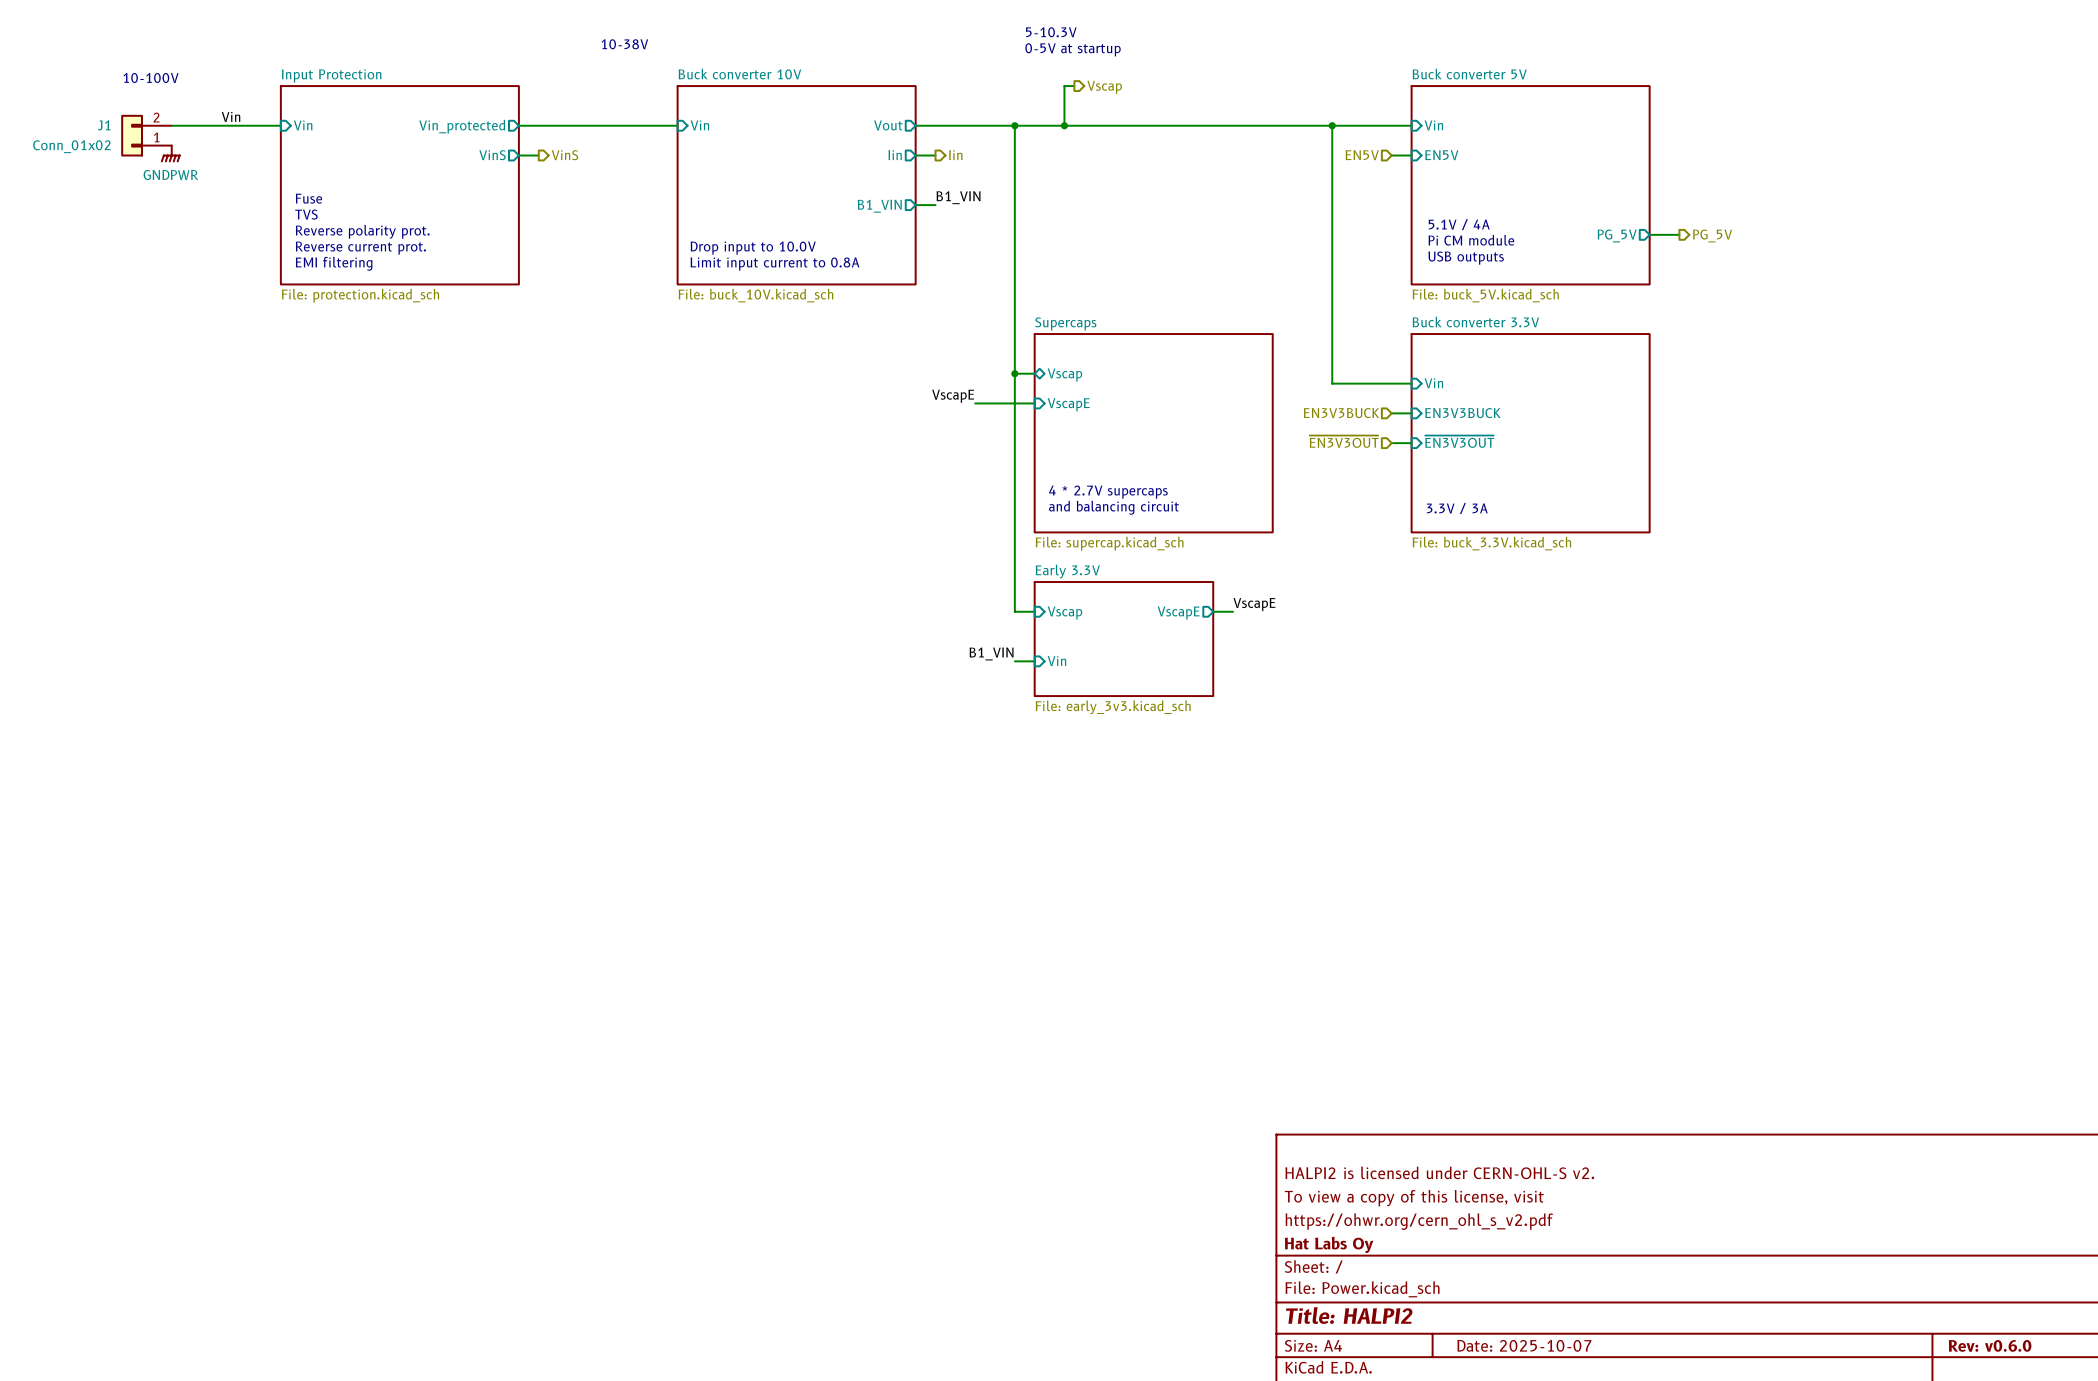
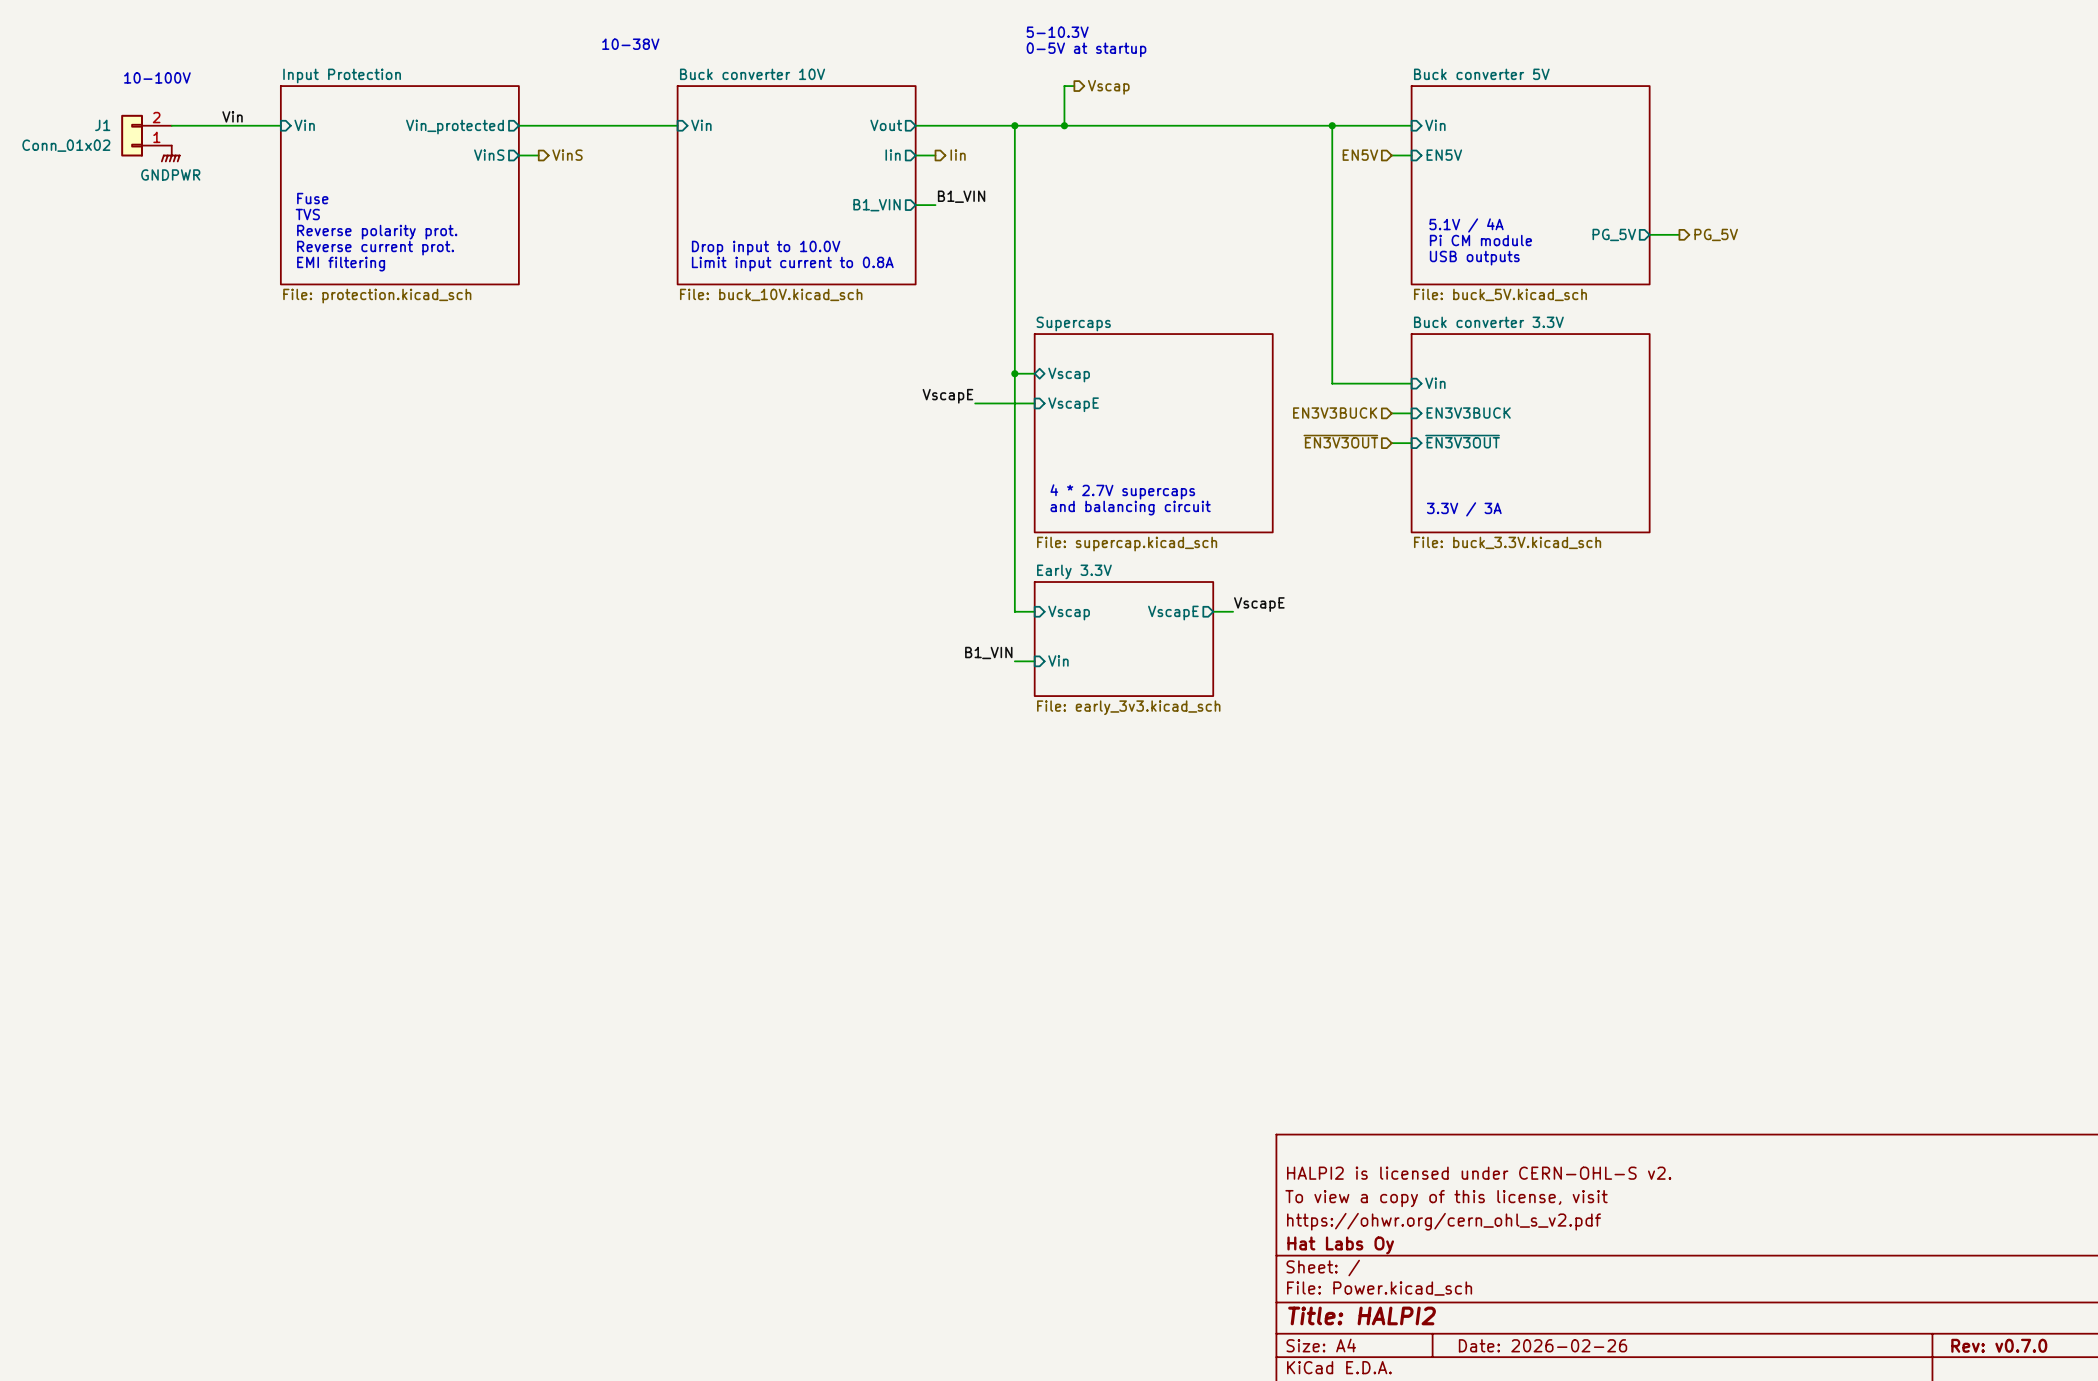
title block: Date: 2025-10-07 (1524, 1345) -> Date: 2026-02-26 (1543, 1345)
title block: Rev: v0.6.0 (1990, 1345) -> Rev: v0.7.0 (1999, 1345)

